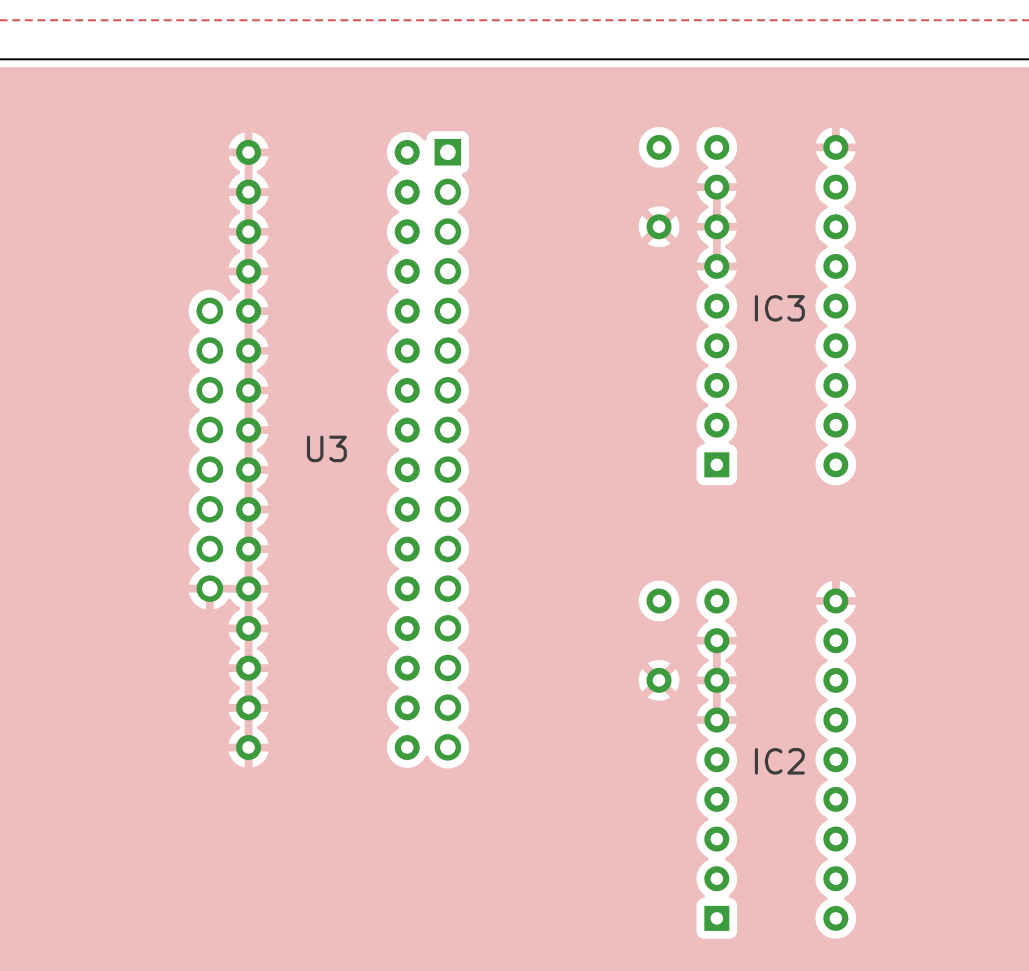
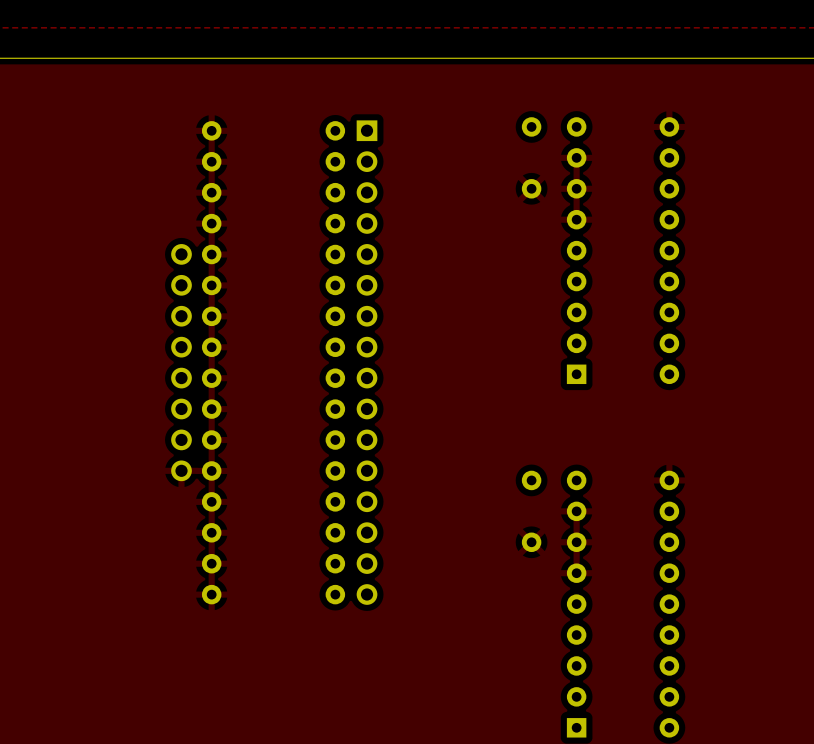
text: IC3 (779, 308) -> none
text: U3 (326, 448) -> none
text: IC2 (779, 761) -> none

